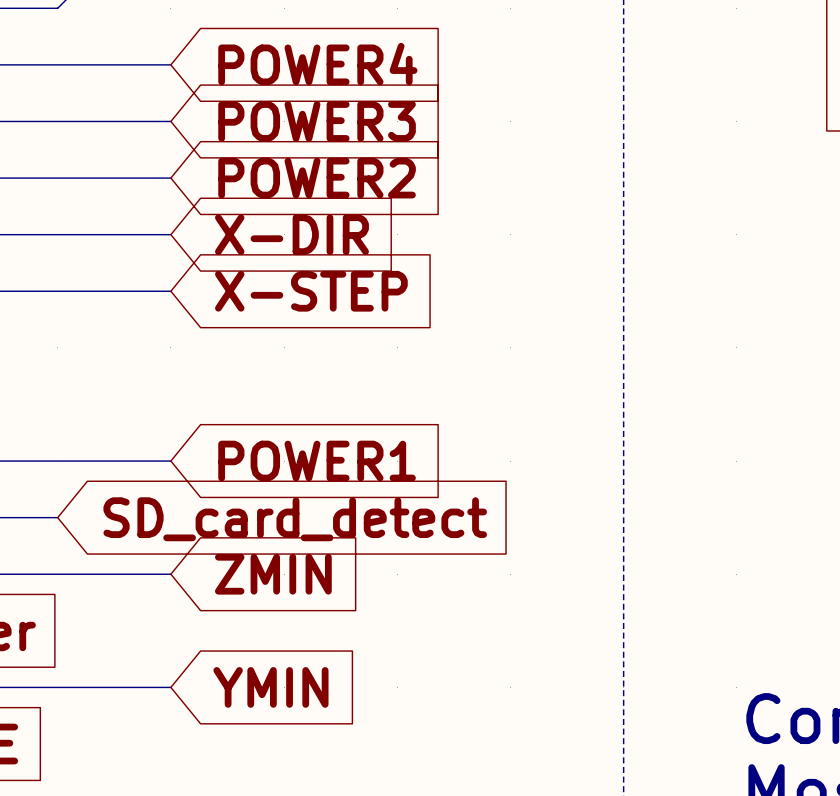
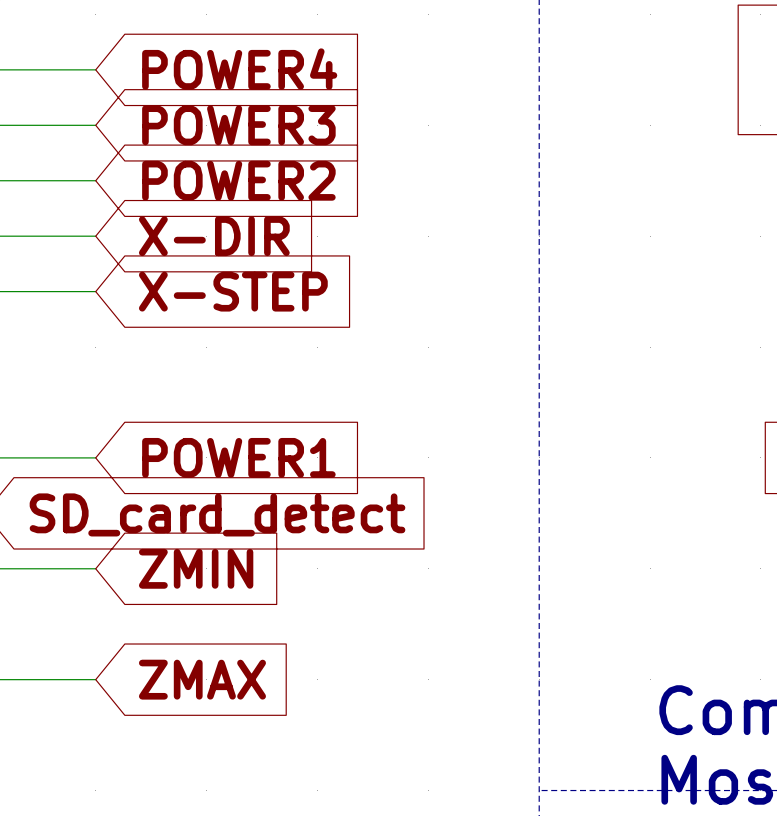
global label: YMIN (270, 687) -> ZMAX (202, 679)

